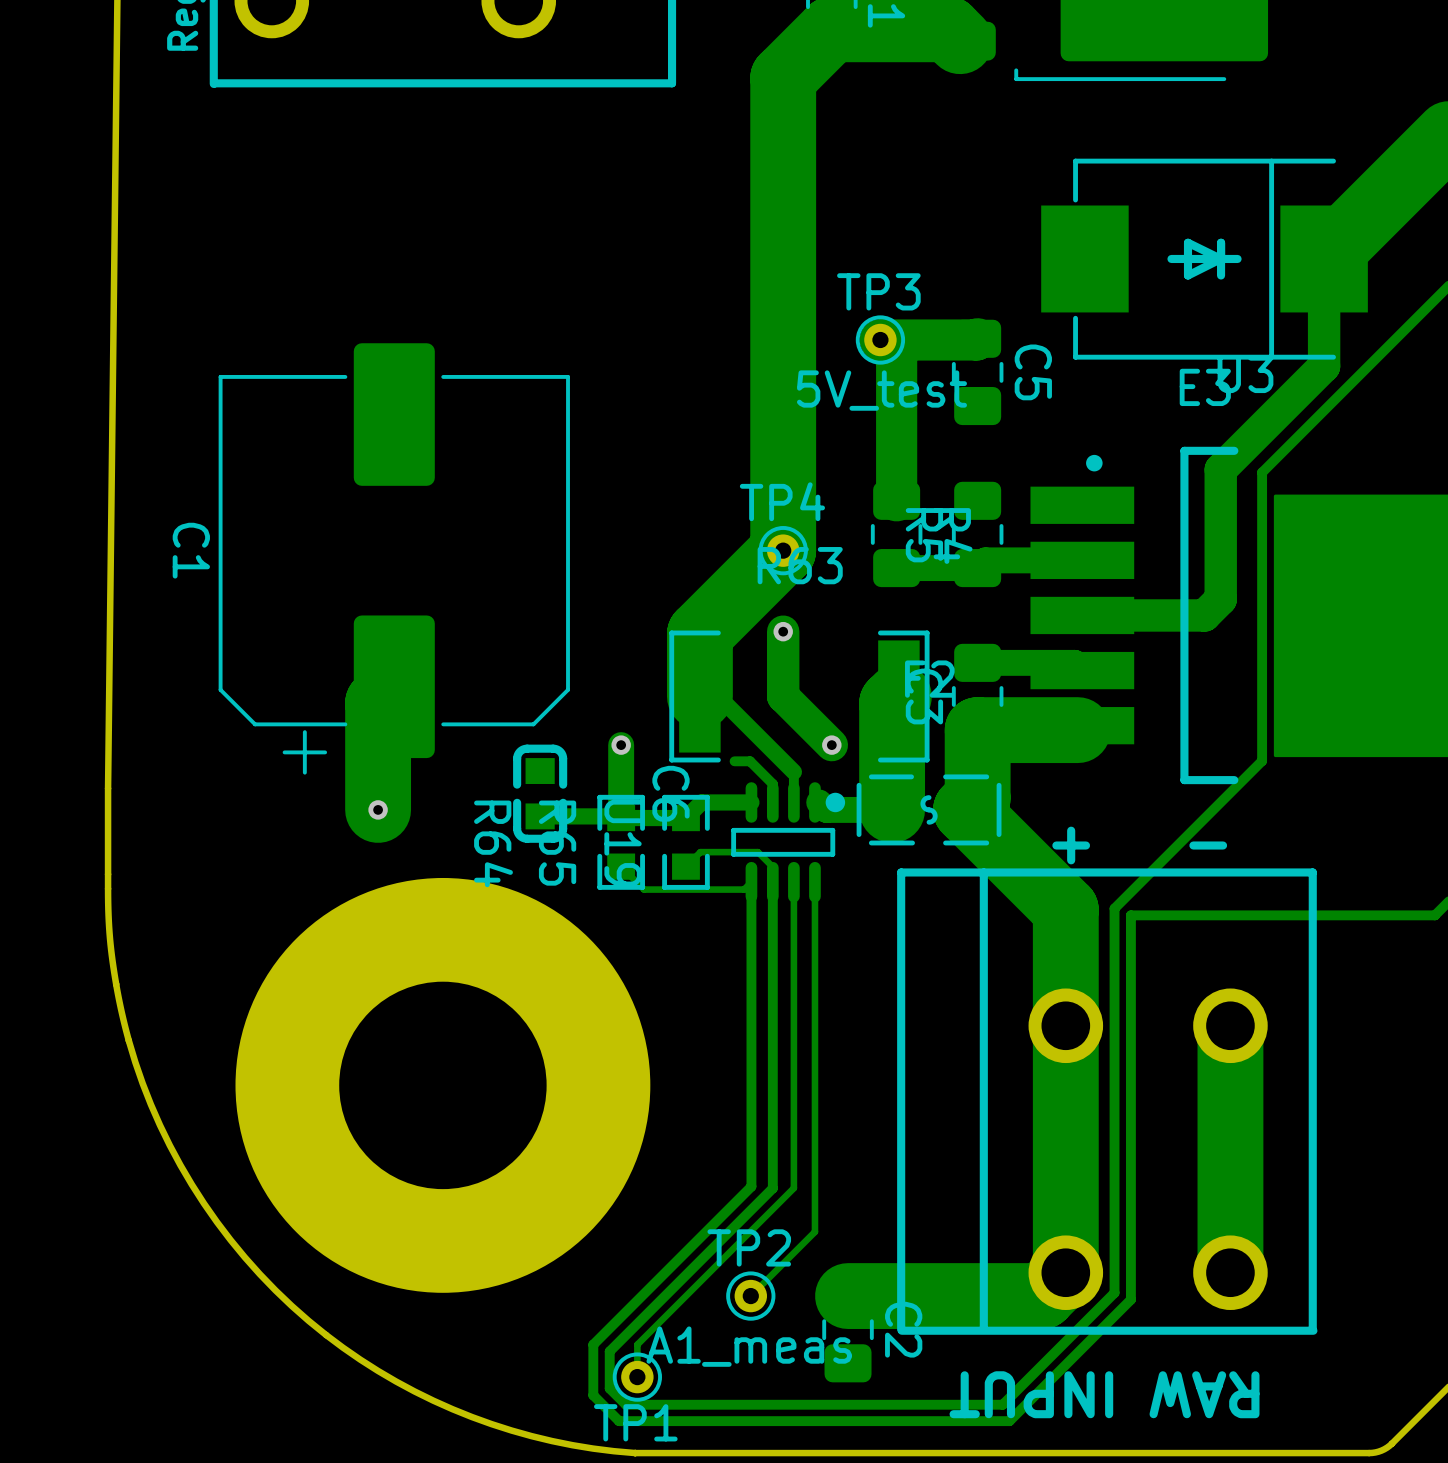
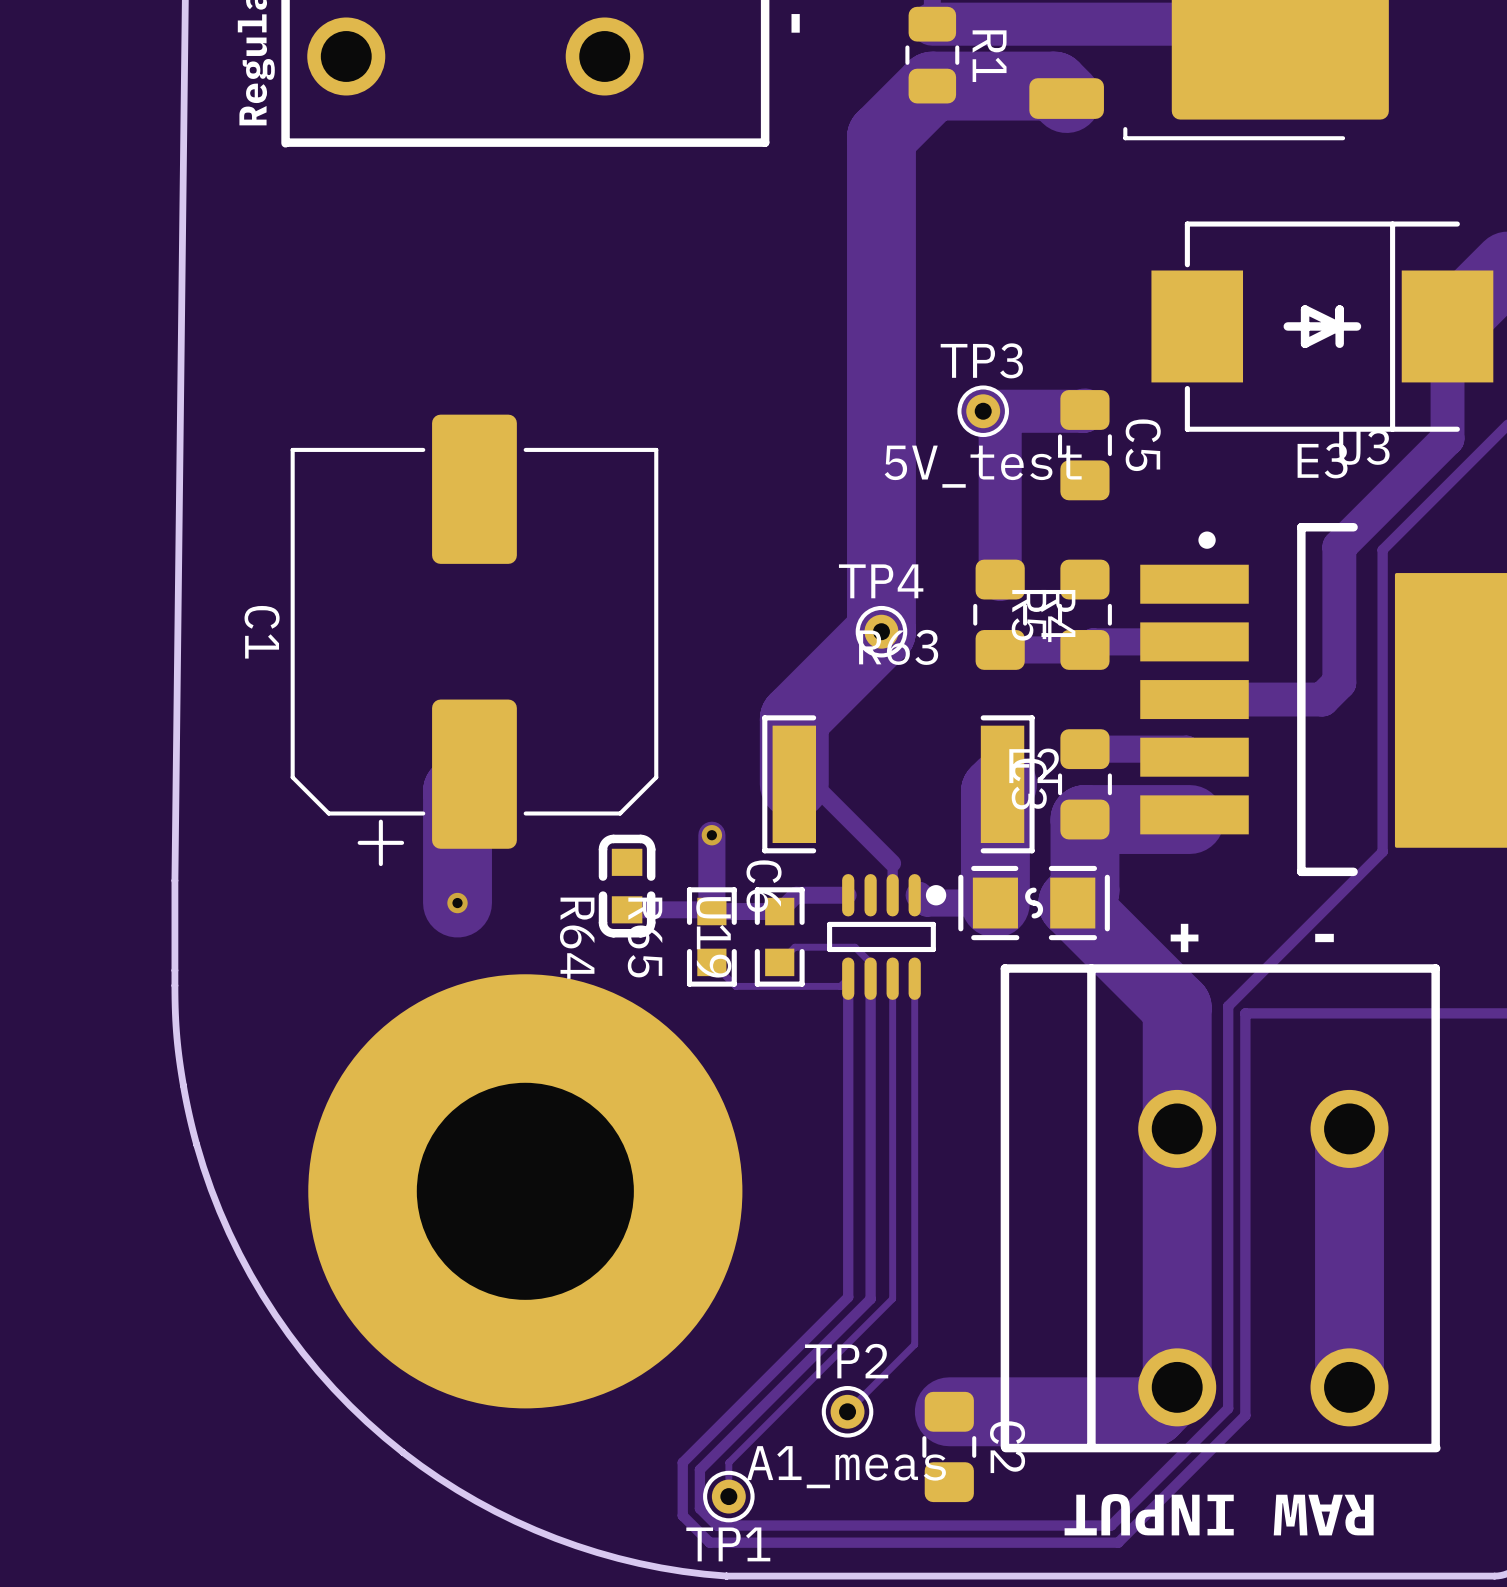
track: (783, 631) (783, 696) (831, 745) -> none
via: (783, 631) -> none
via: (831, 745) -> none
track: (734, 761) (750, 761) (772, 784) (772, 802) -> none

